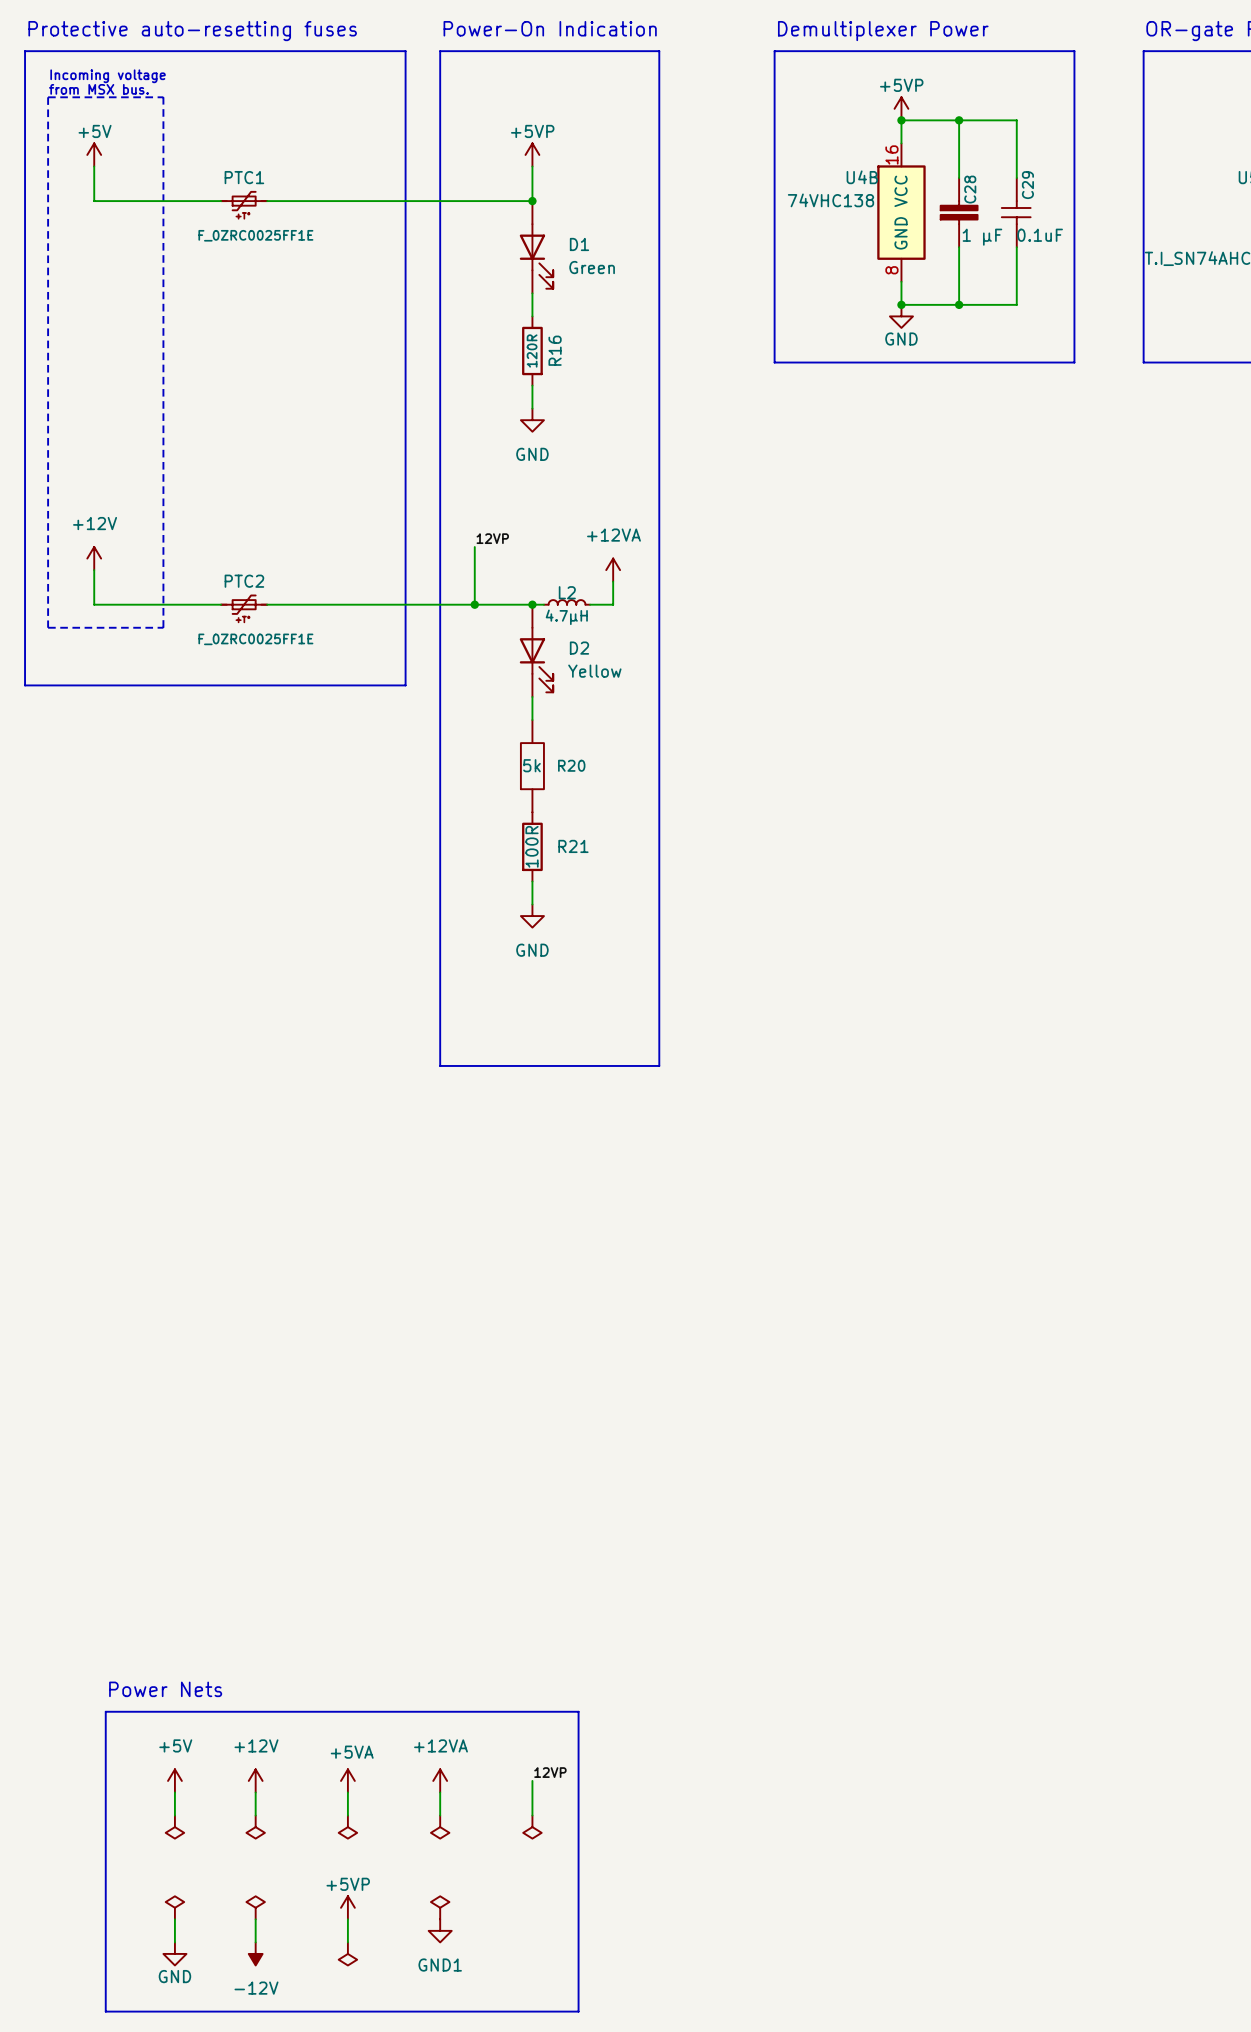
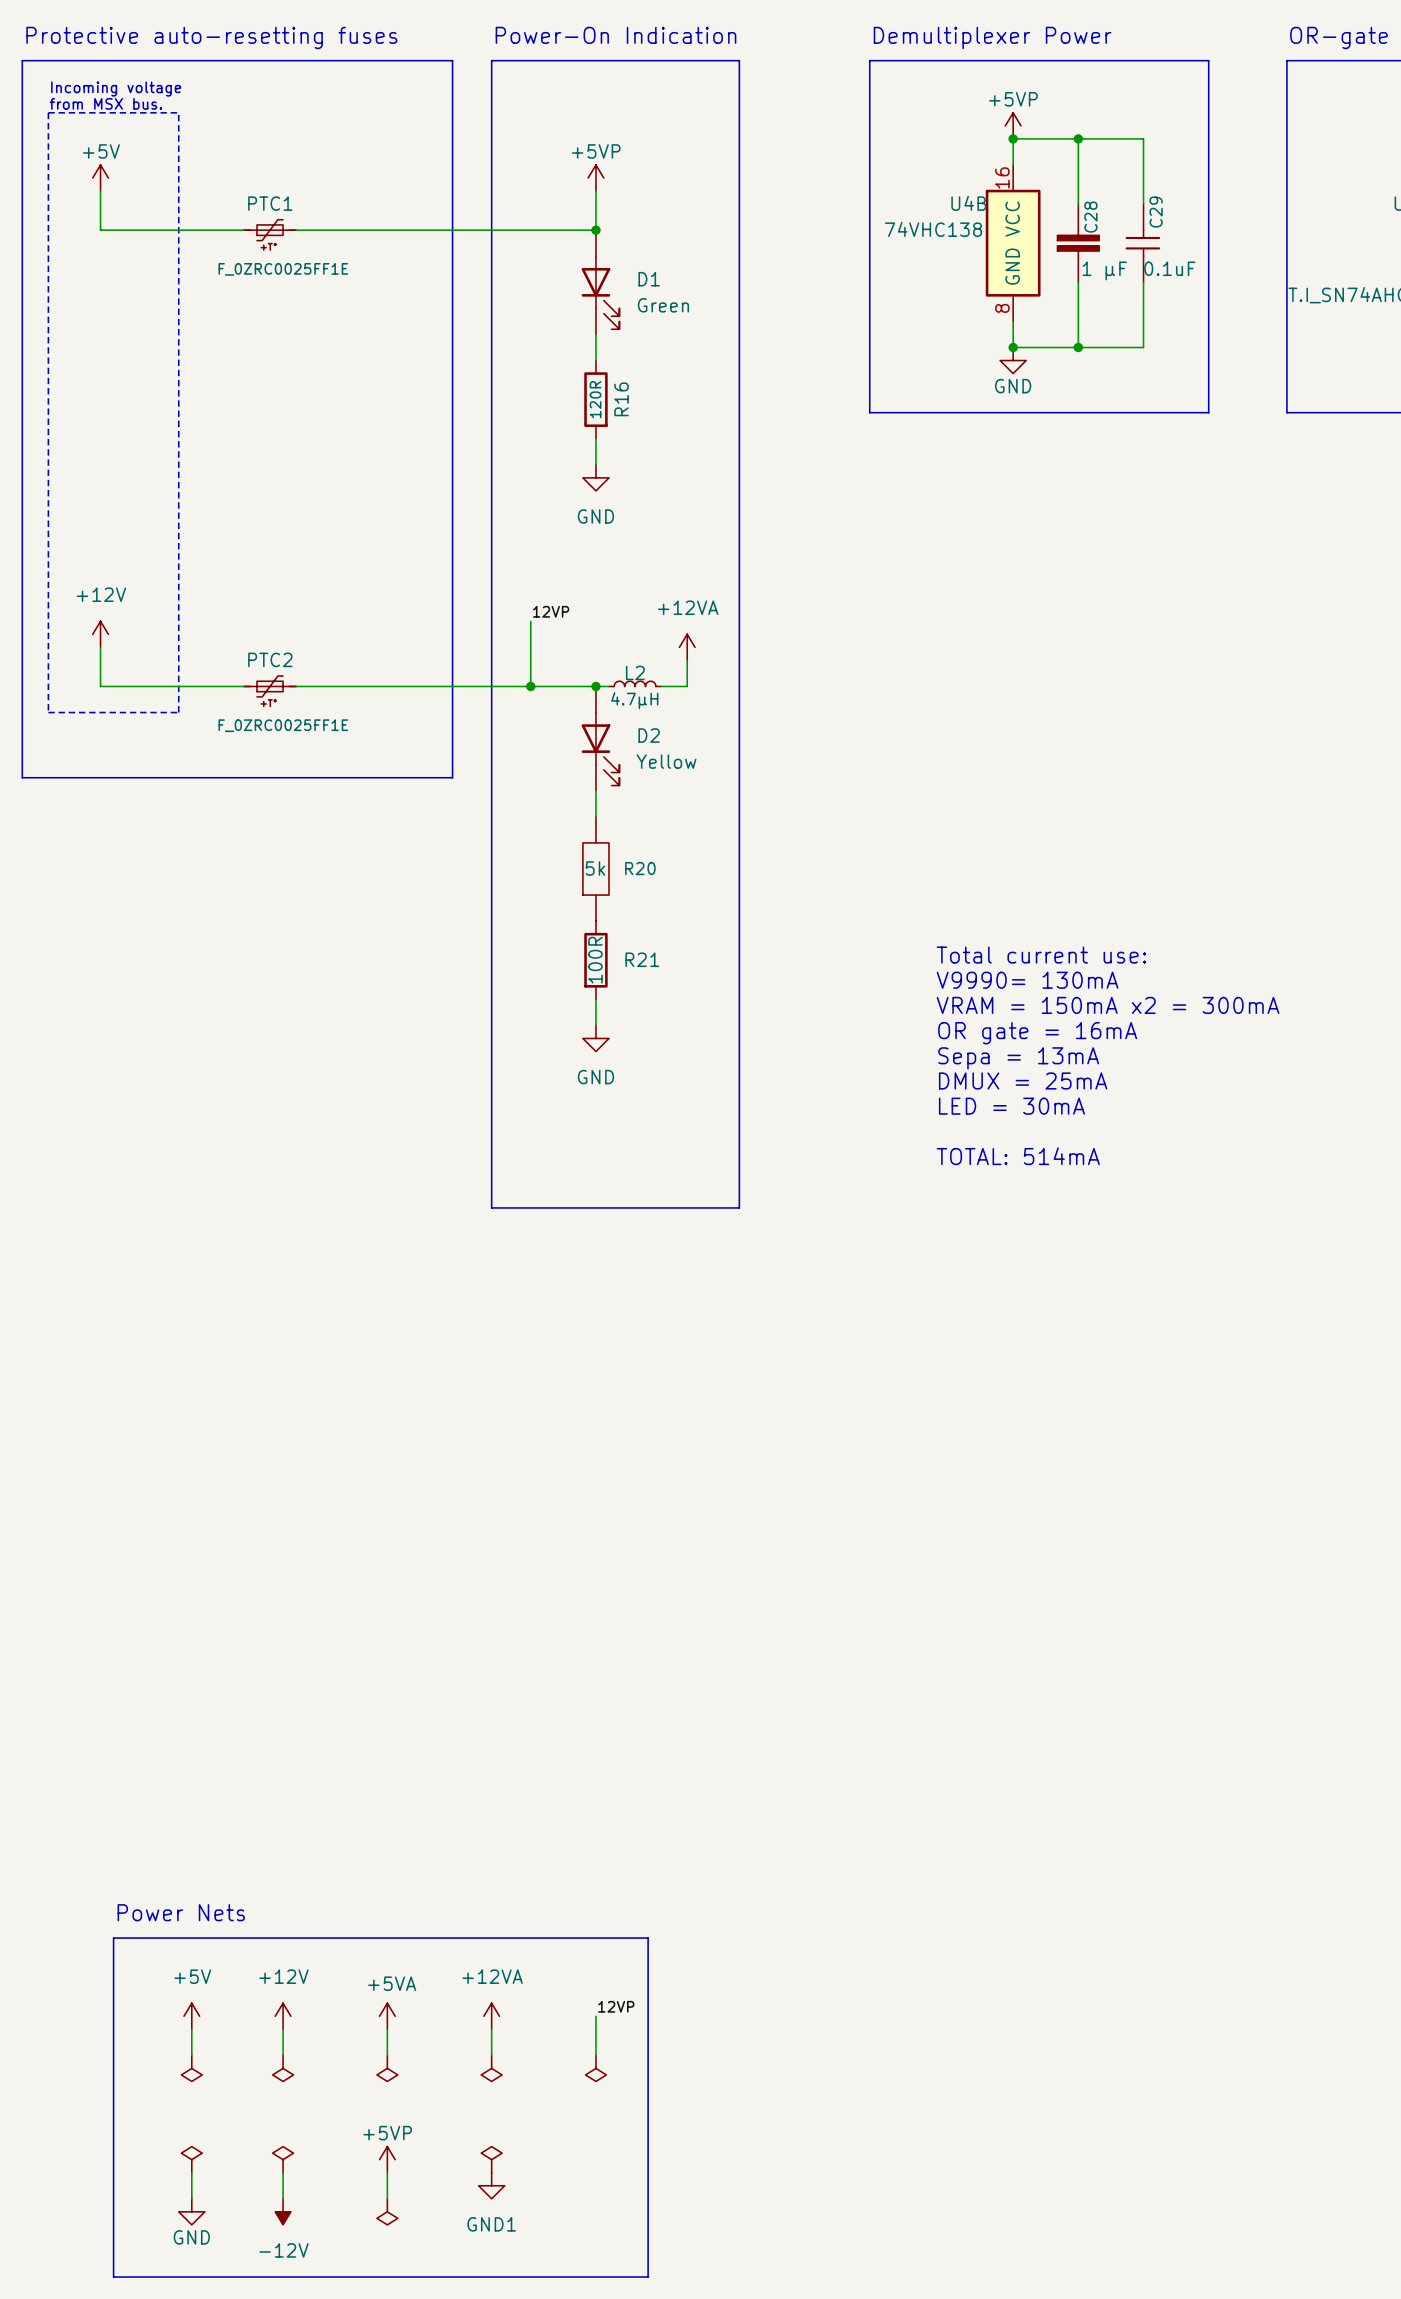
text: none -> Total current use: (1041, 955)
text: none -> V9990= 130mA (1027, 980)
text: none -> VRAM = 150mA x2 = 300mA (1108, 1005)
text: none -> OR gate = 16mA (1037, 1033)
text: none -> Sepa = 13mA (1018, 1058)
text: none -> DMUX = 25mA (1023, 1080)
text: none -> LED = 30mA (1011, 1106)
text: none -> TOTAL: 514mA (1018, 1156)

